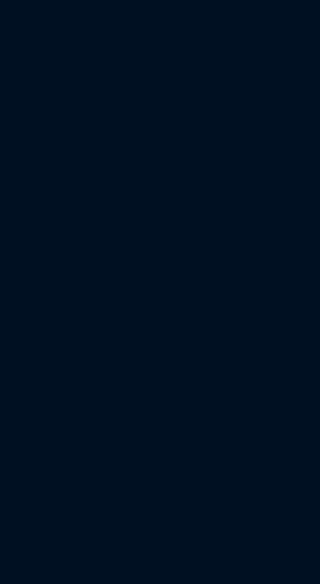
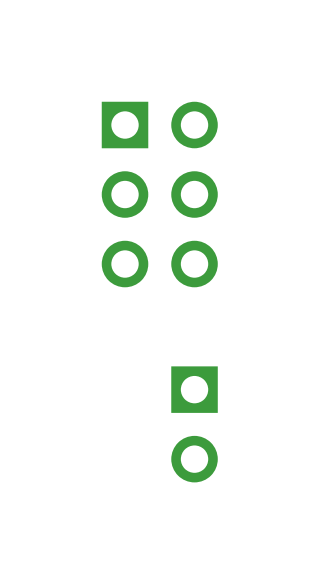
part: none -> (159, 194)
part: none -> (194, 424)

